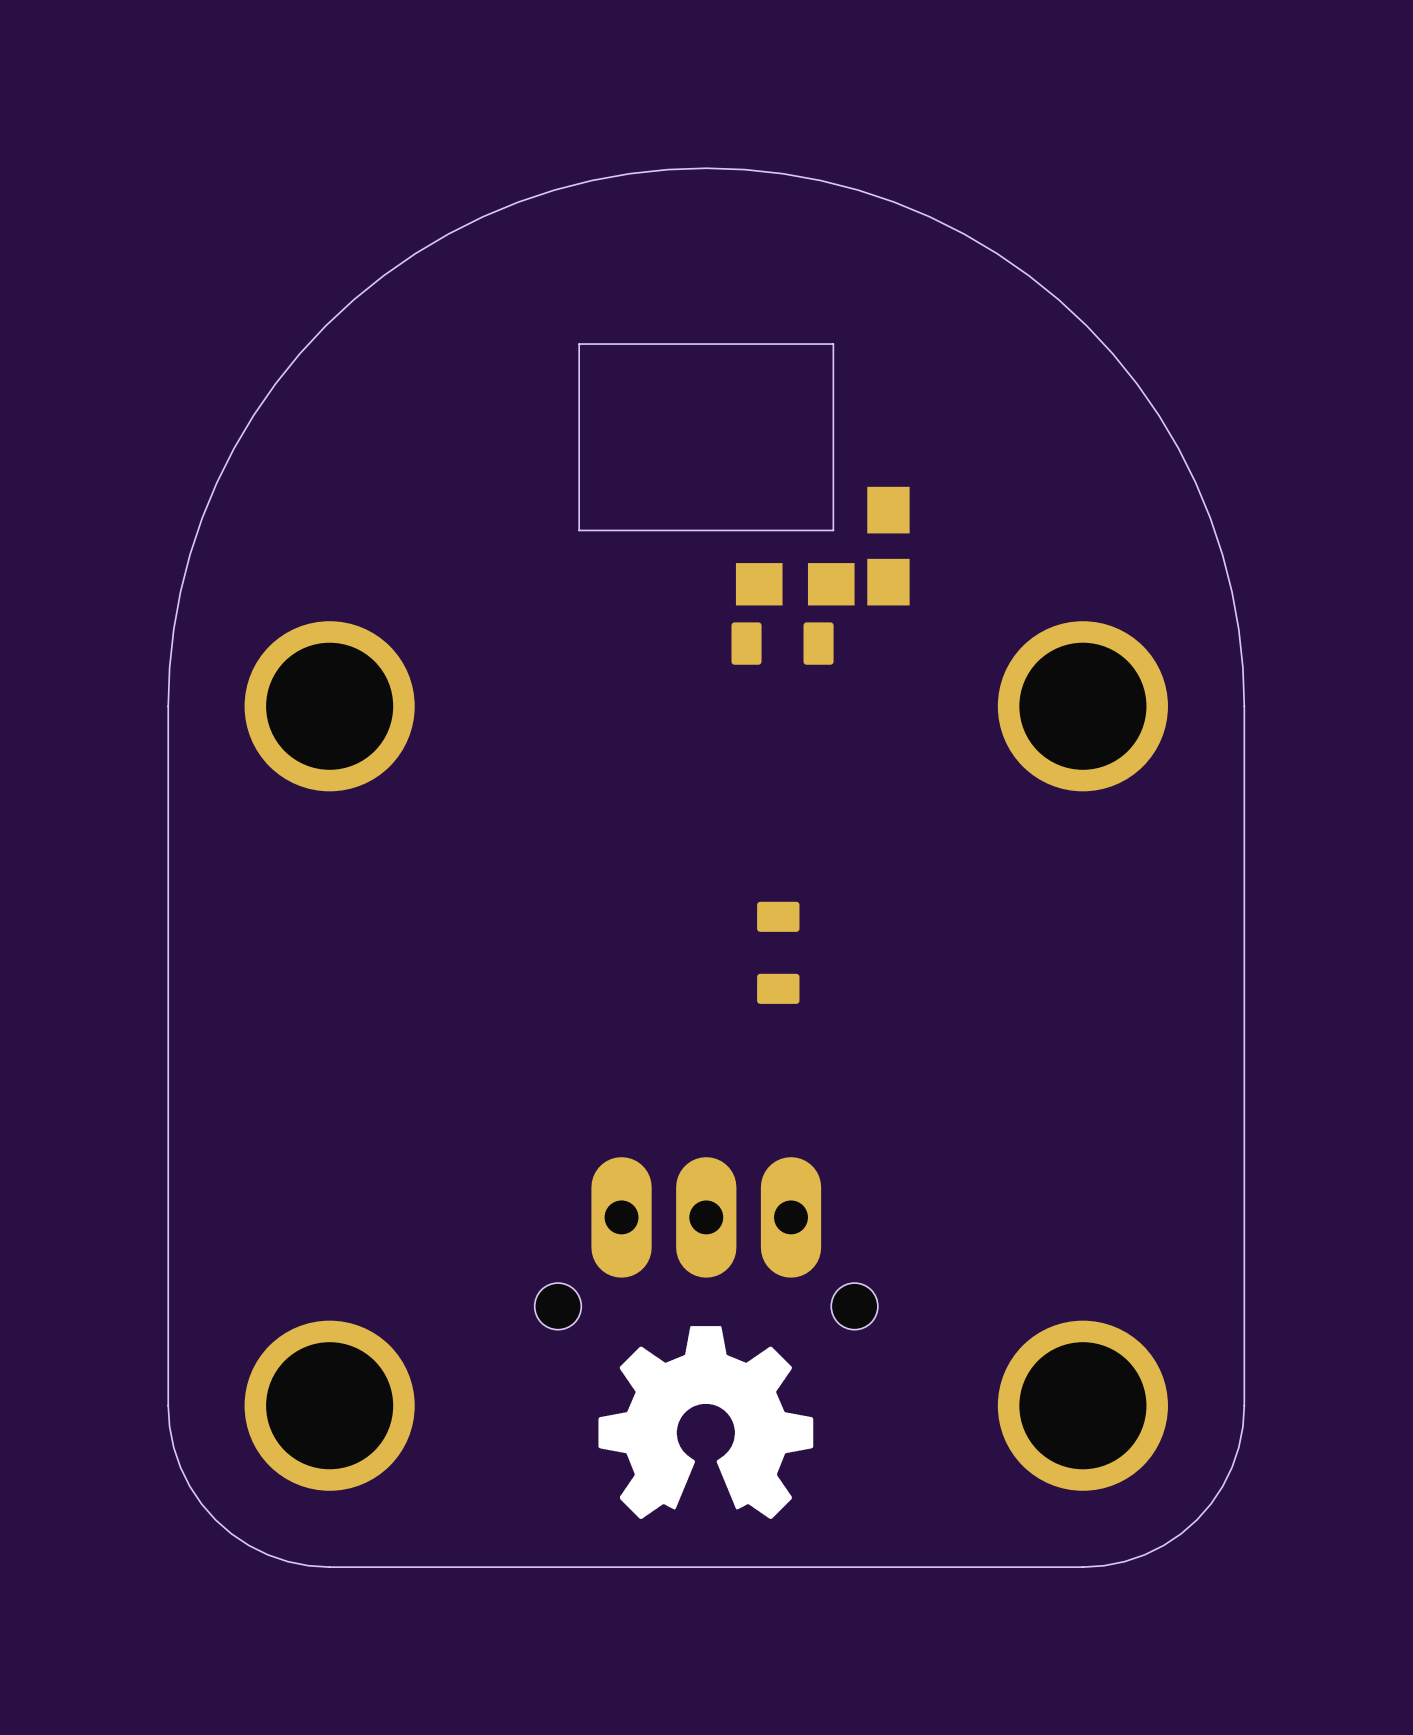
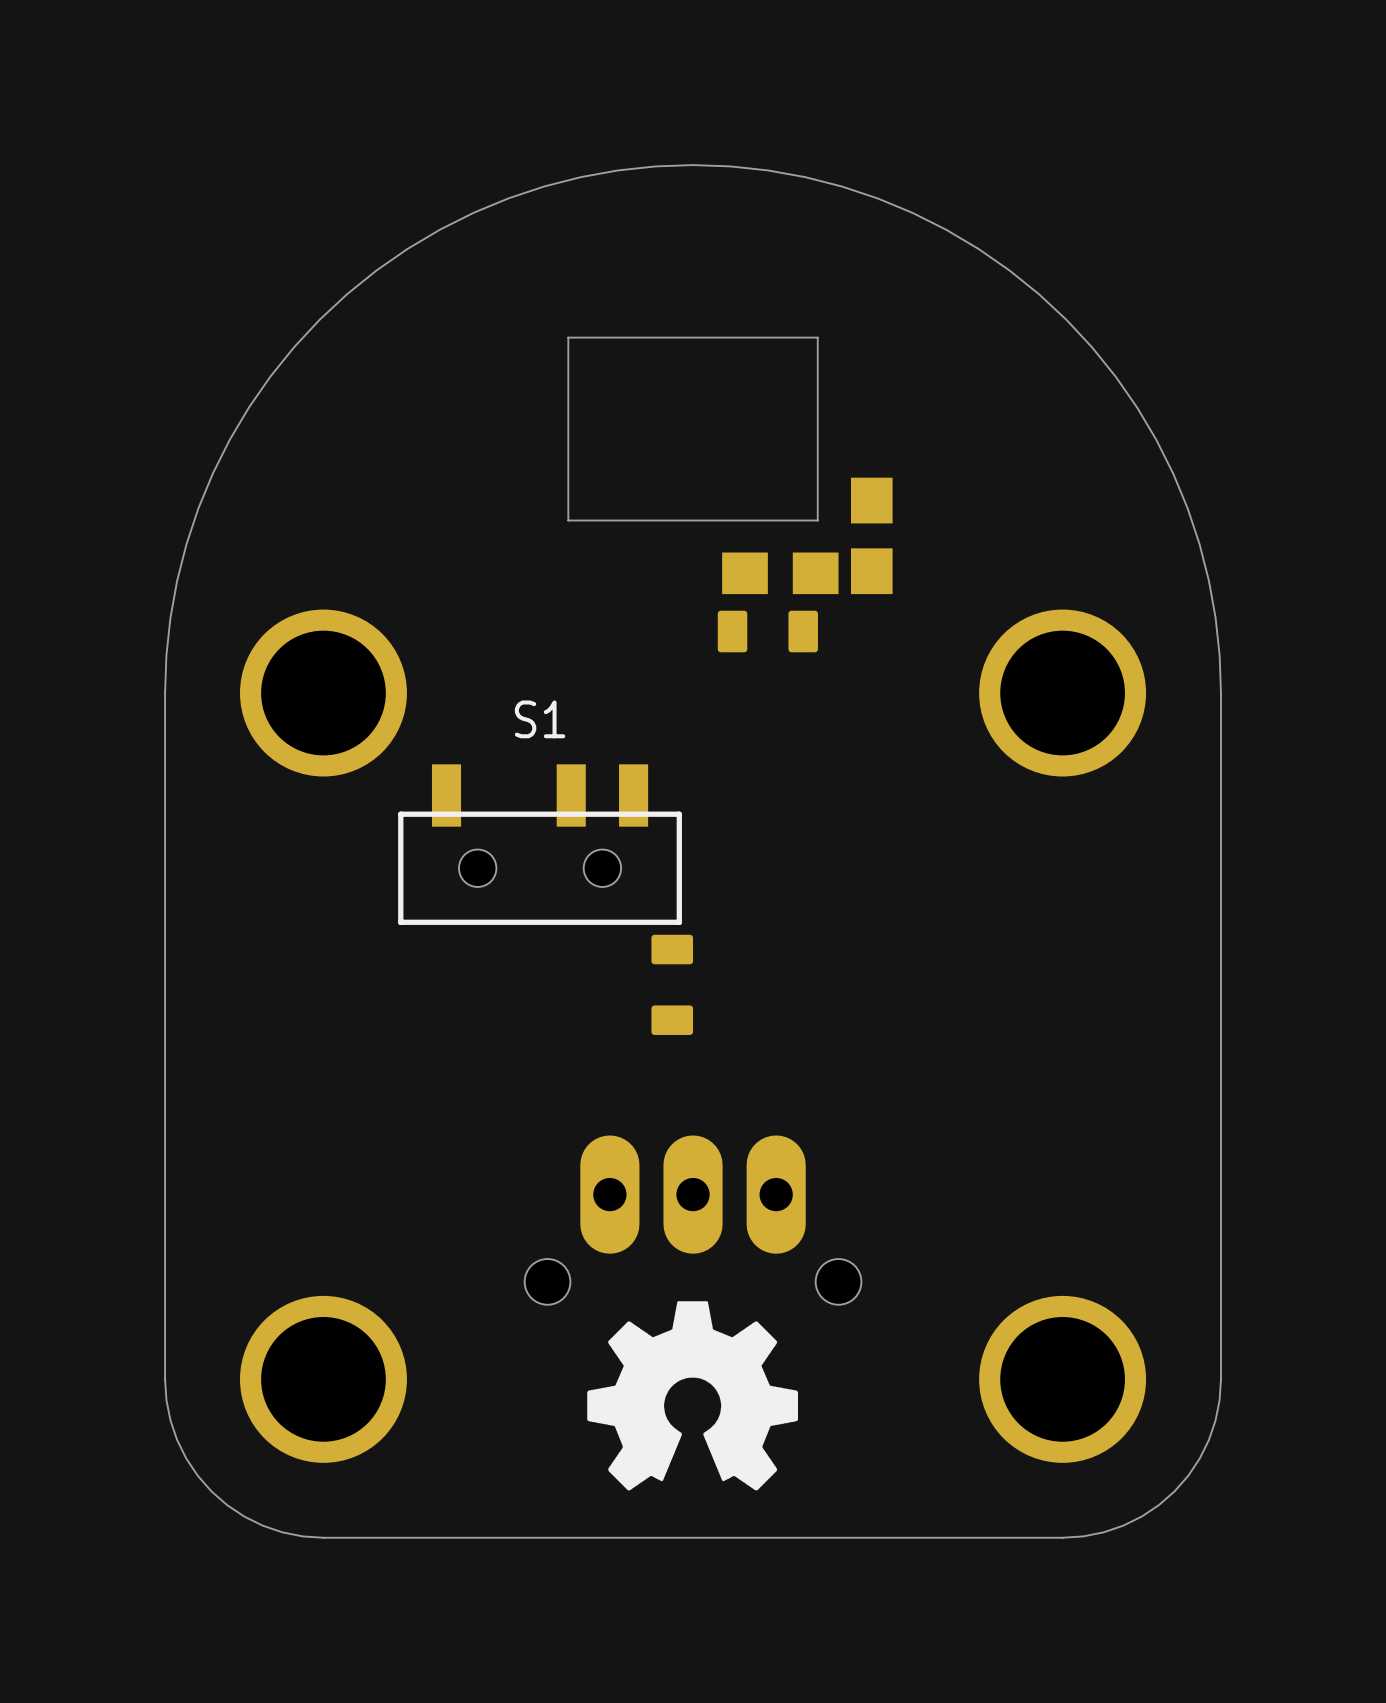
S1: none -> (540, 844)
part position: (778, 952) -> (672, 984)

